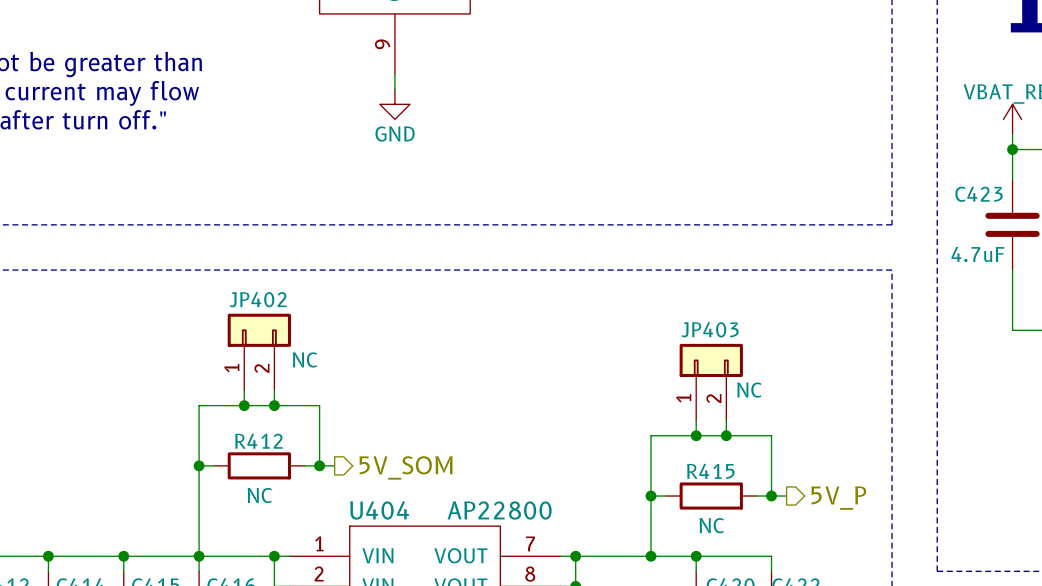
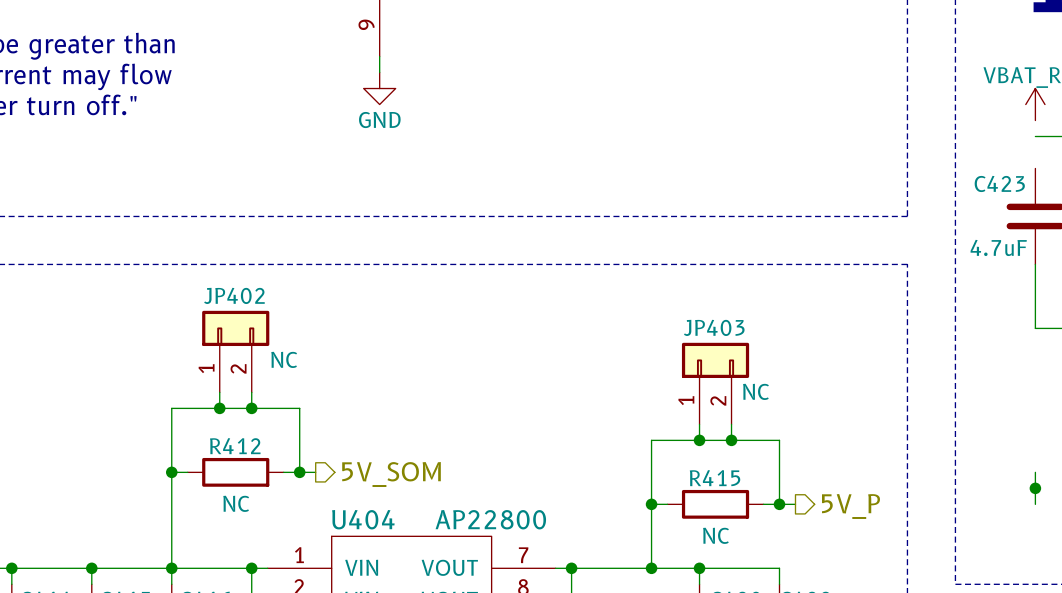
wire: (1012, 134) (1012, 179) -> none
junction: (1012, 149) -> none
wire: none -> (1035, 472) (1035, 504)
junction: none -> (1035, 488)

